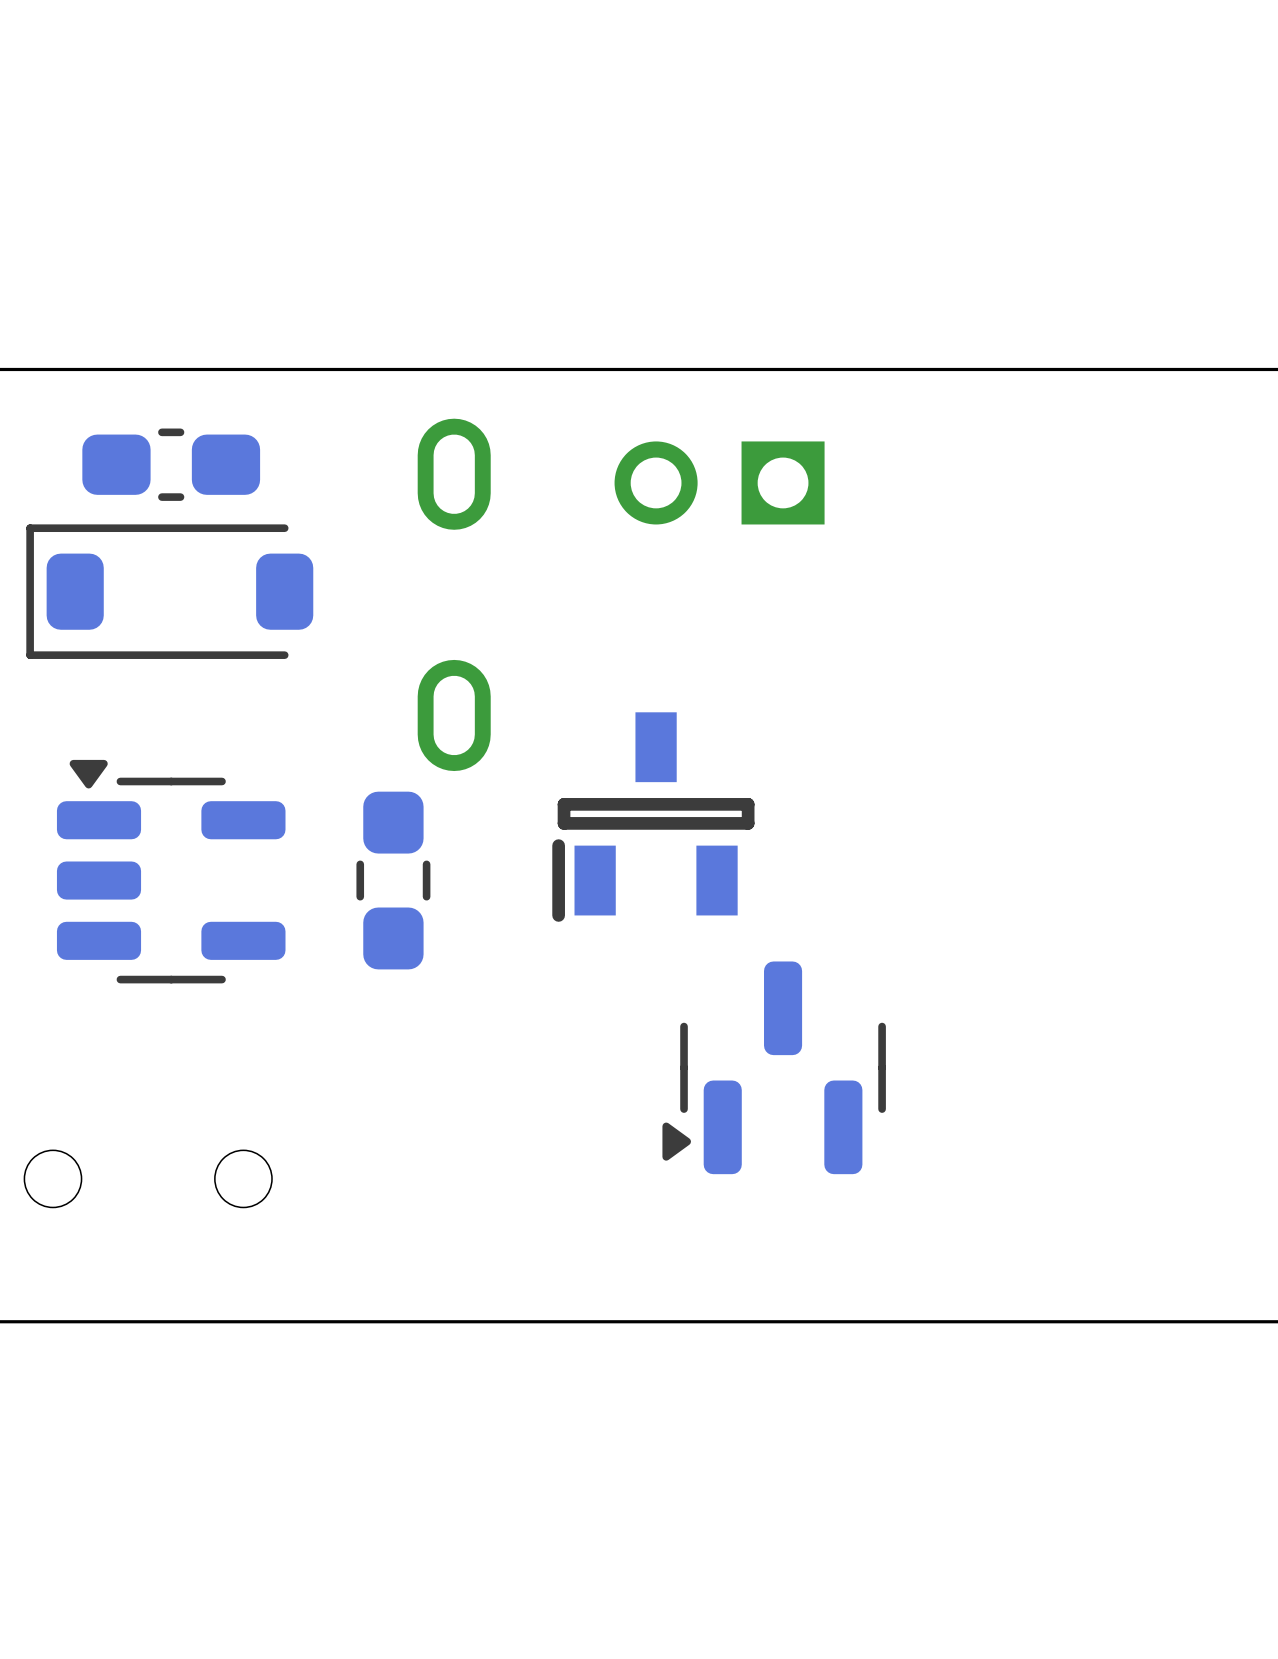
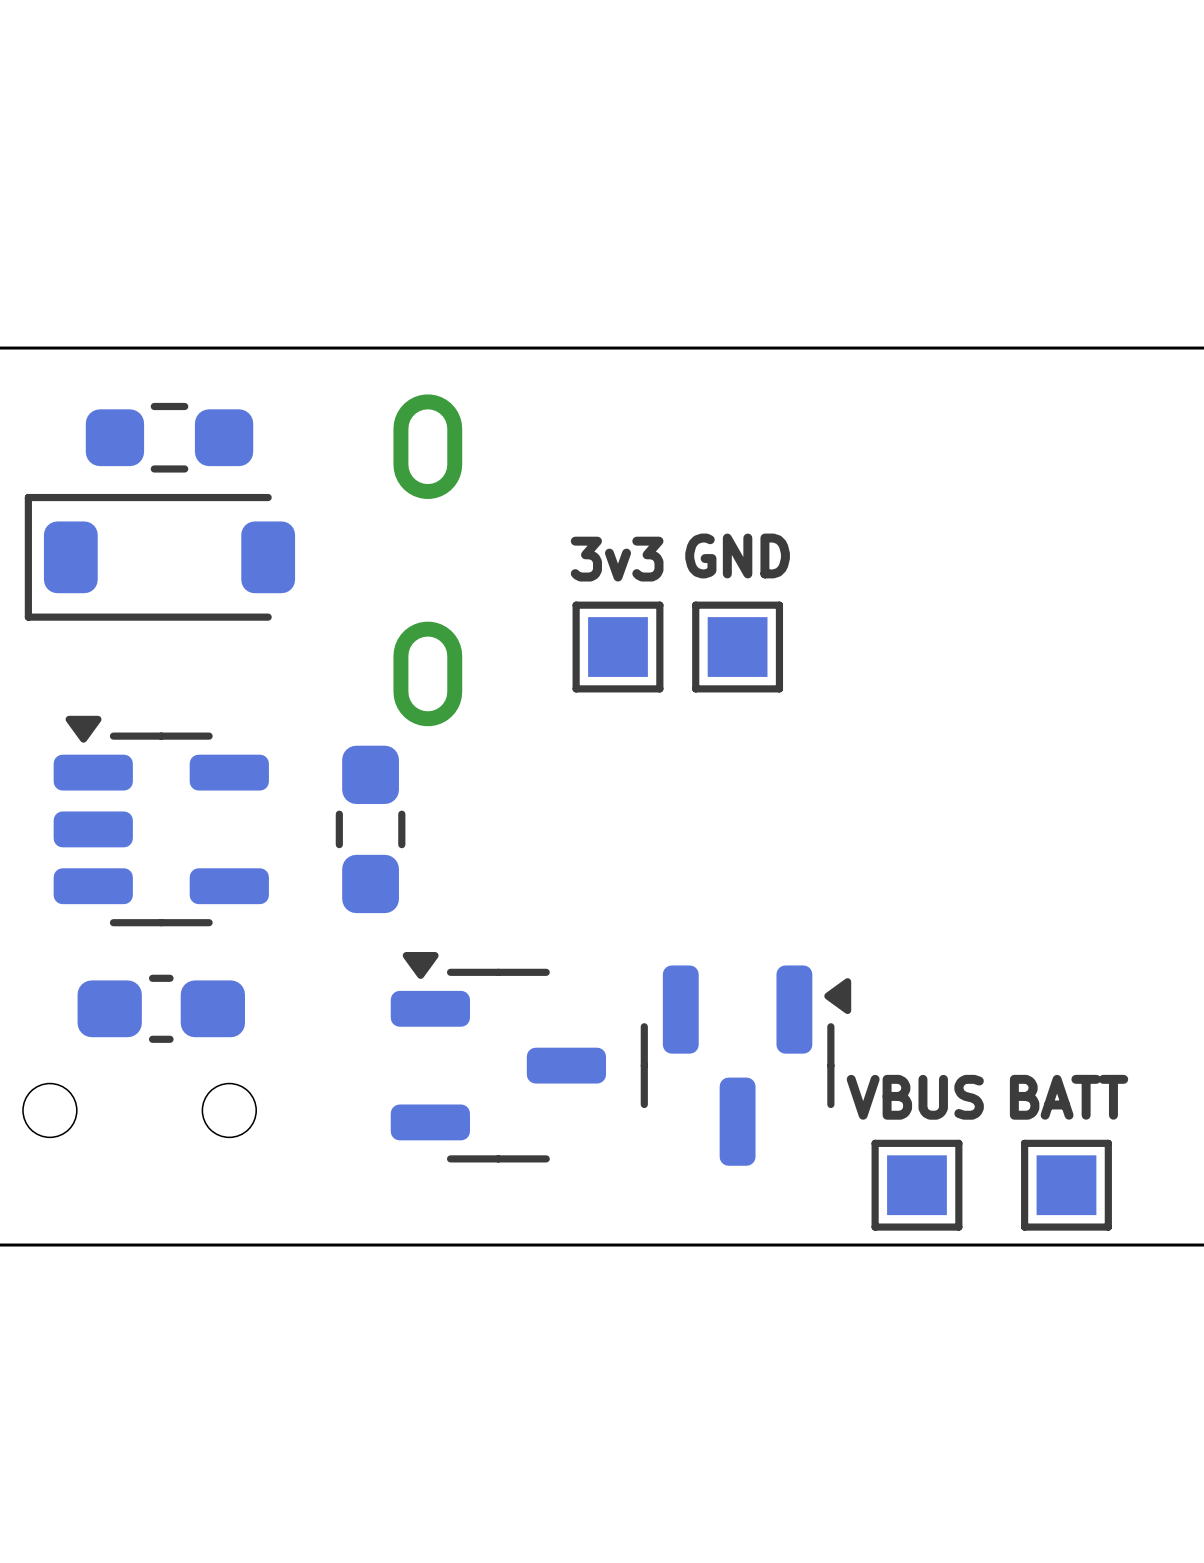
part footprint: [82, 428, 261, 501] -> [85, 402, 254, 473]
part: (719, 482) -> none
3v3: none -> (617, 647)
GND: none -> (737, 647)
part: (653, 817) -> none
part rotation: 0° (774, 1067) -> 180° (745, 1065)
part: none -> (161, 1008)
part: none -> (498, 1057)
VBUS: none -> (916, 1185)
BATT: none -> (1066, 1185)

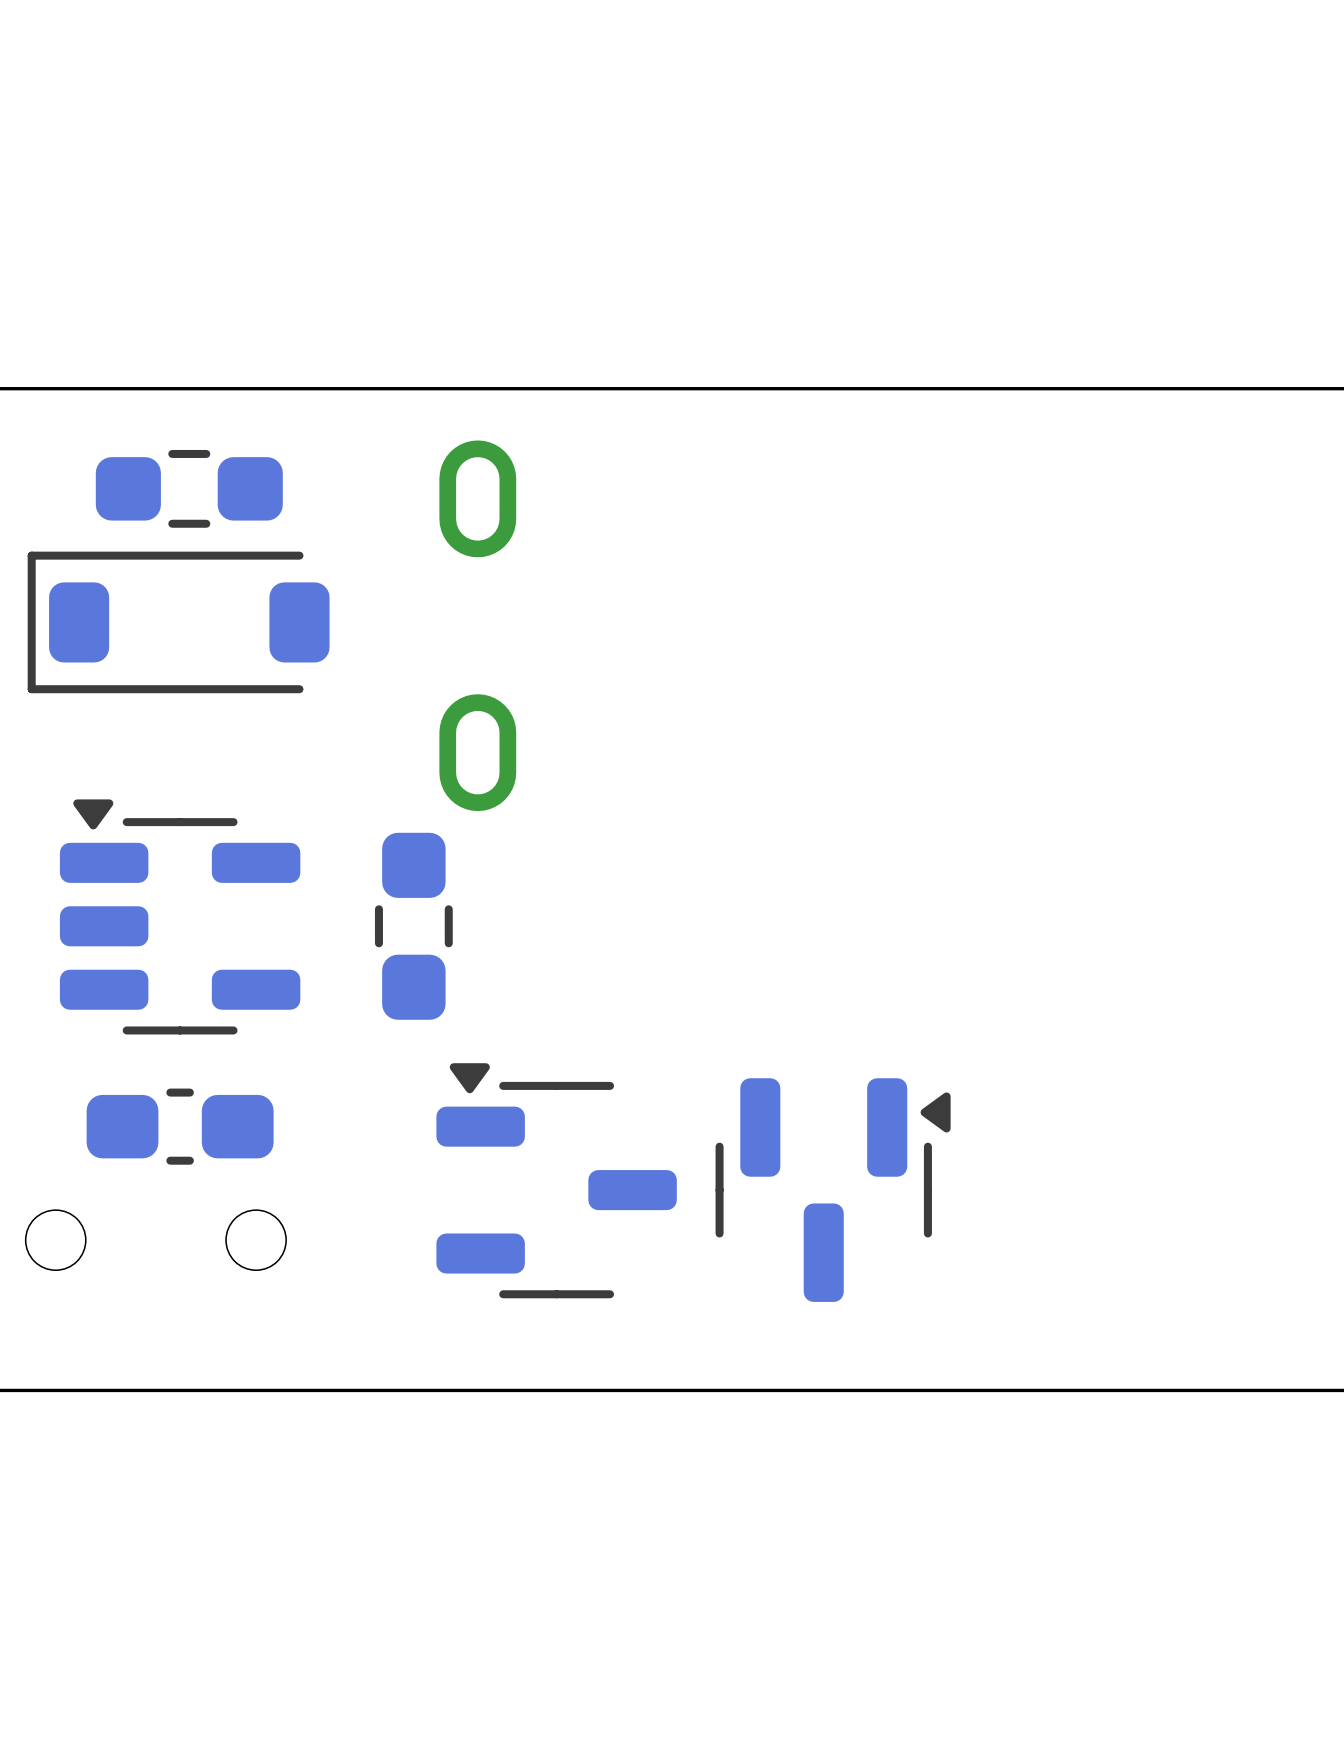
3v3: (617, 647) -> none
GND: (737, 647) -> none
VBUS: (916, 1185) -> none
BATT: (1066, 1185) -> none

